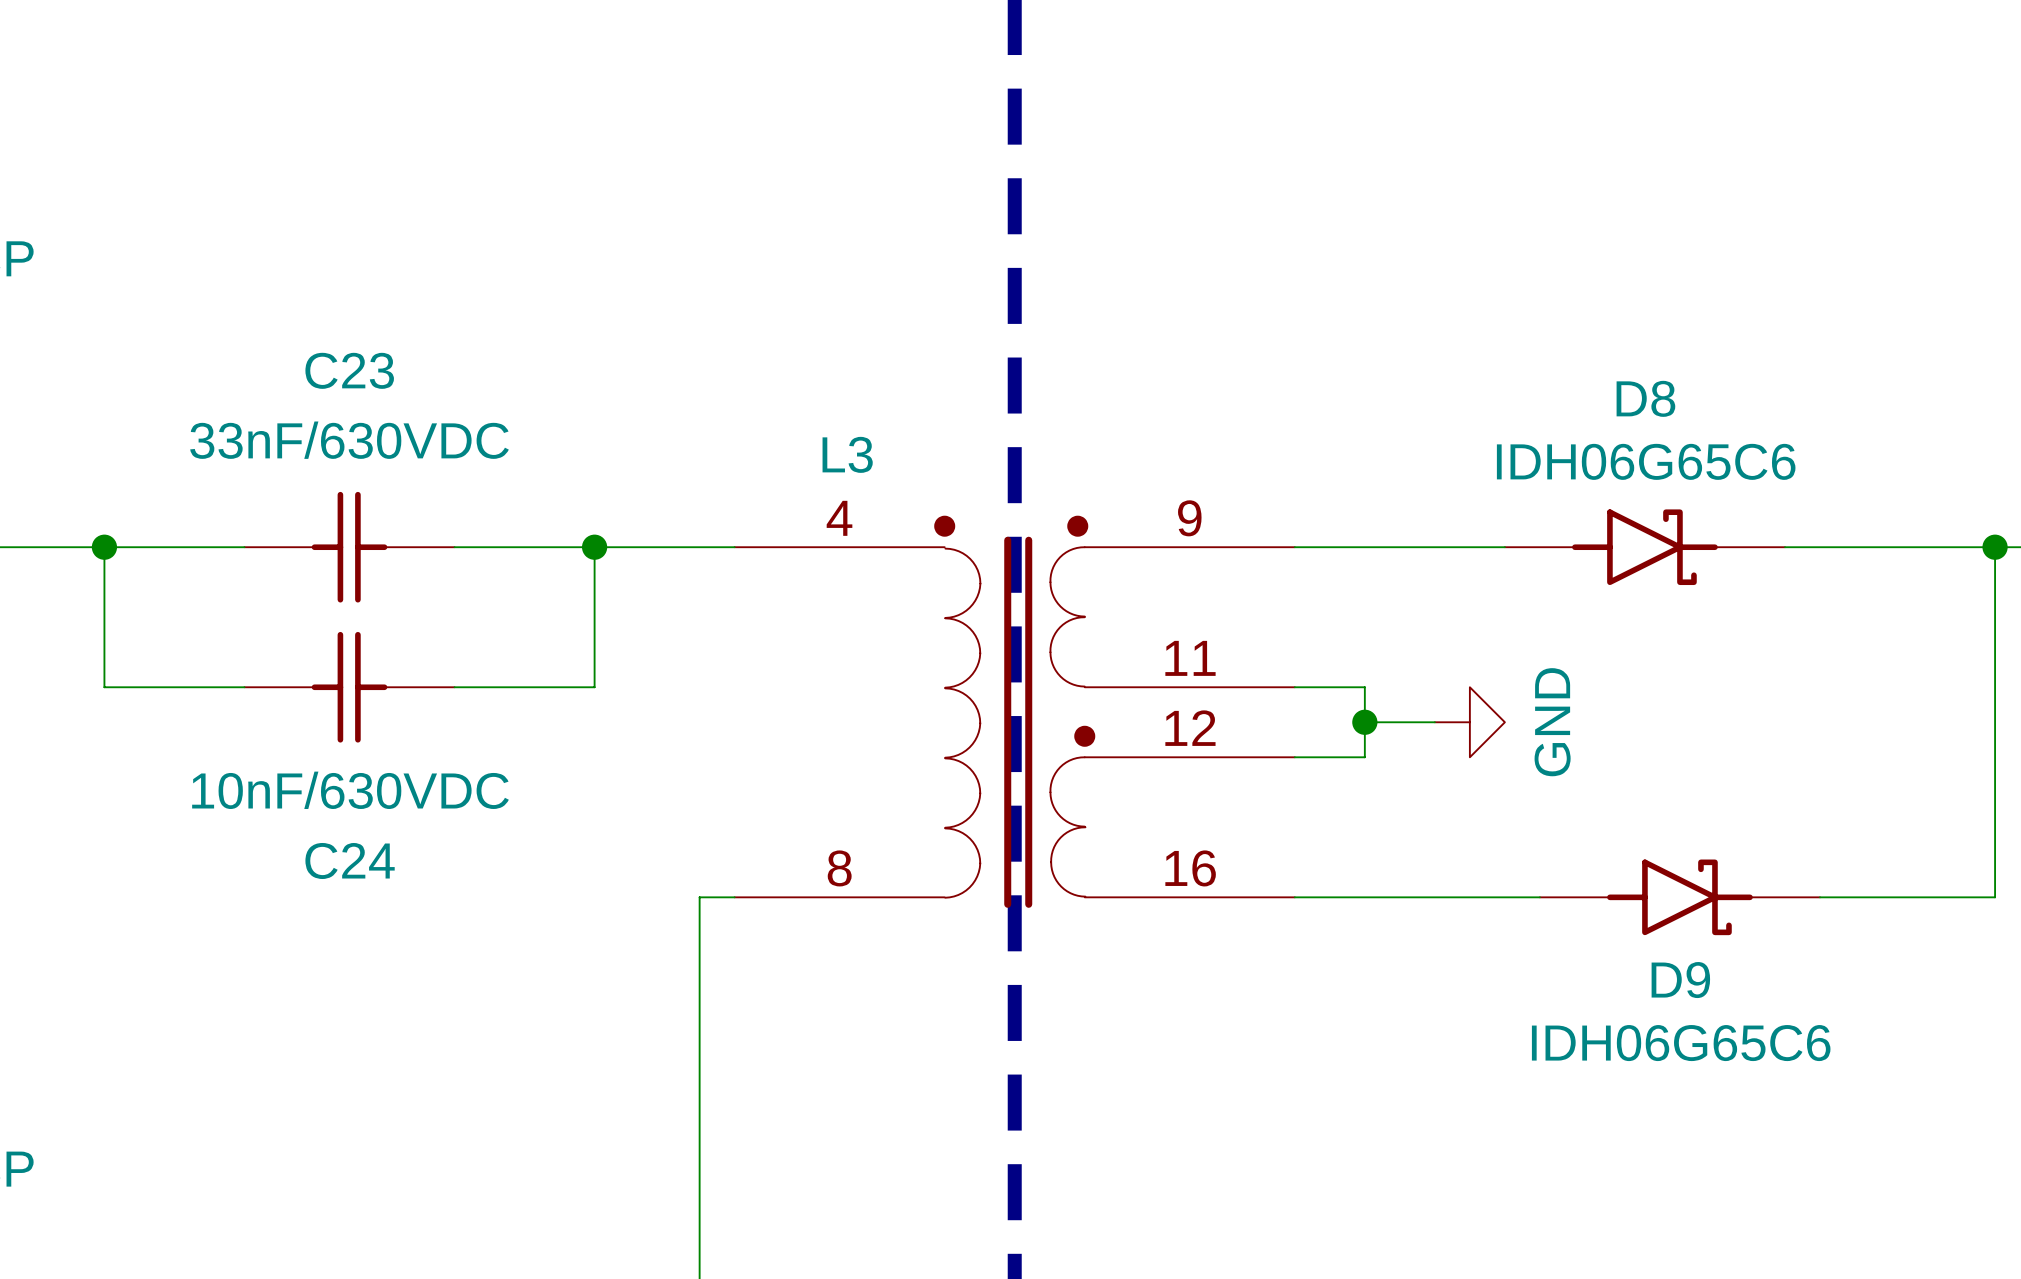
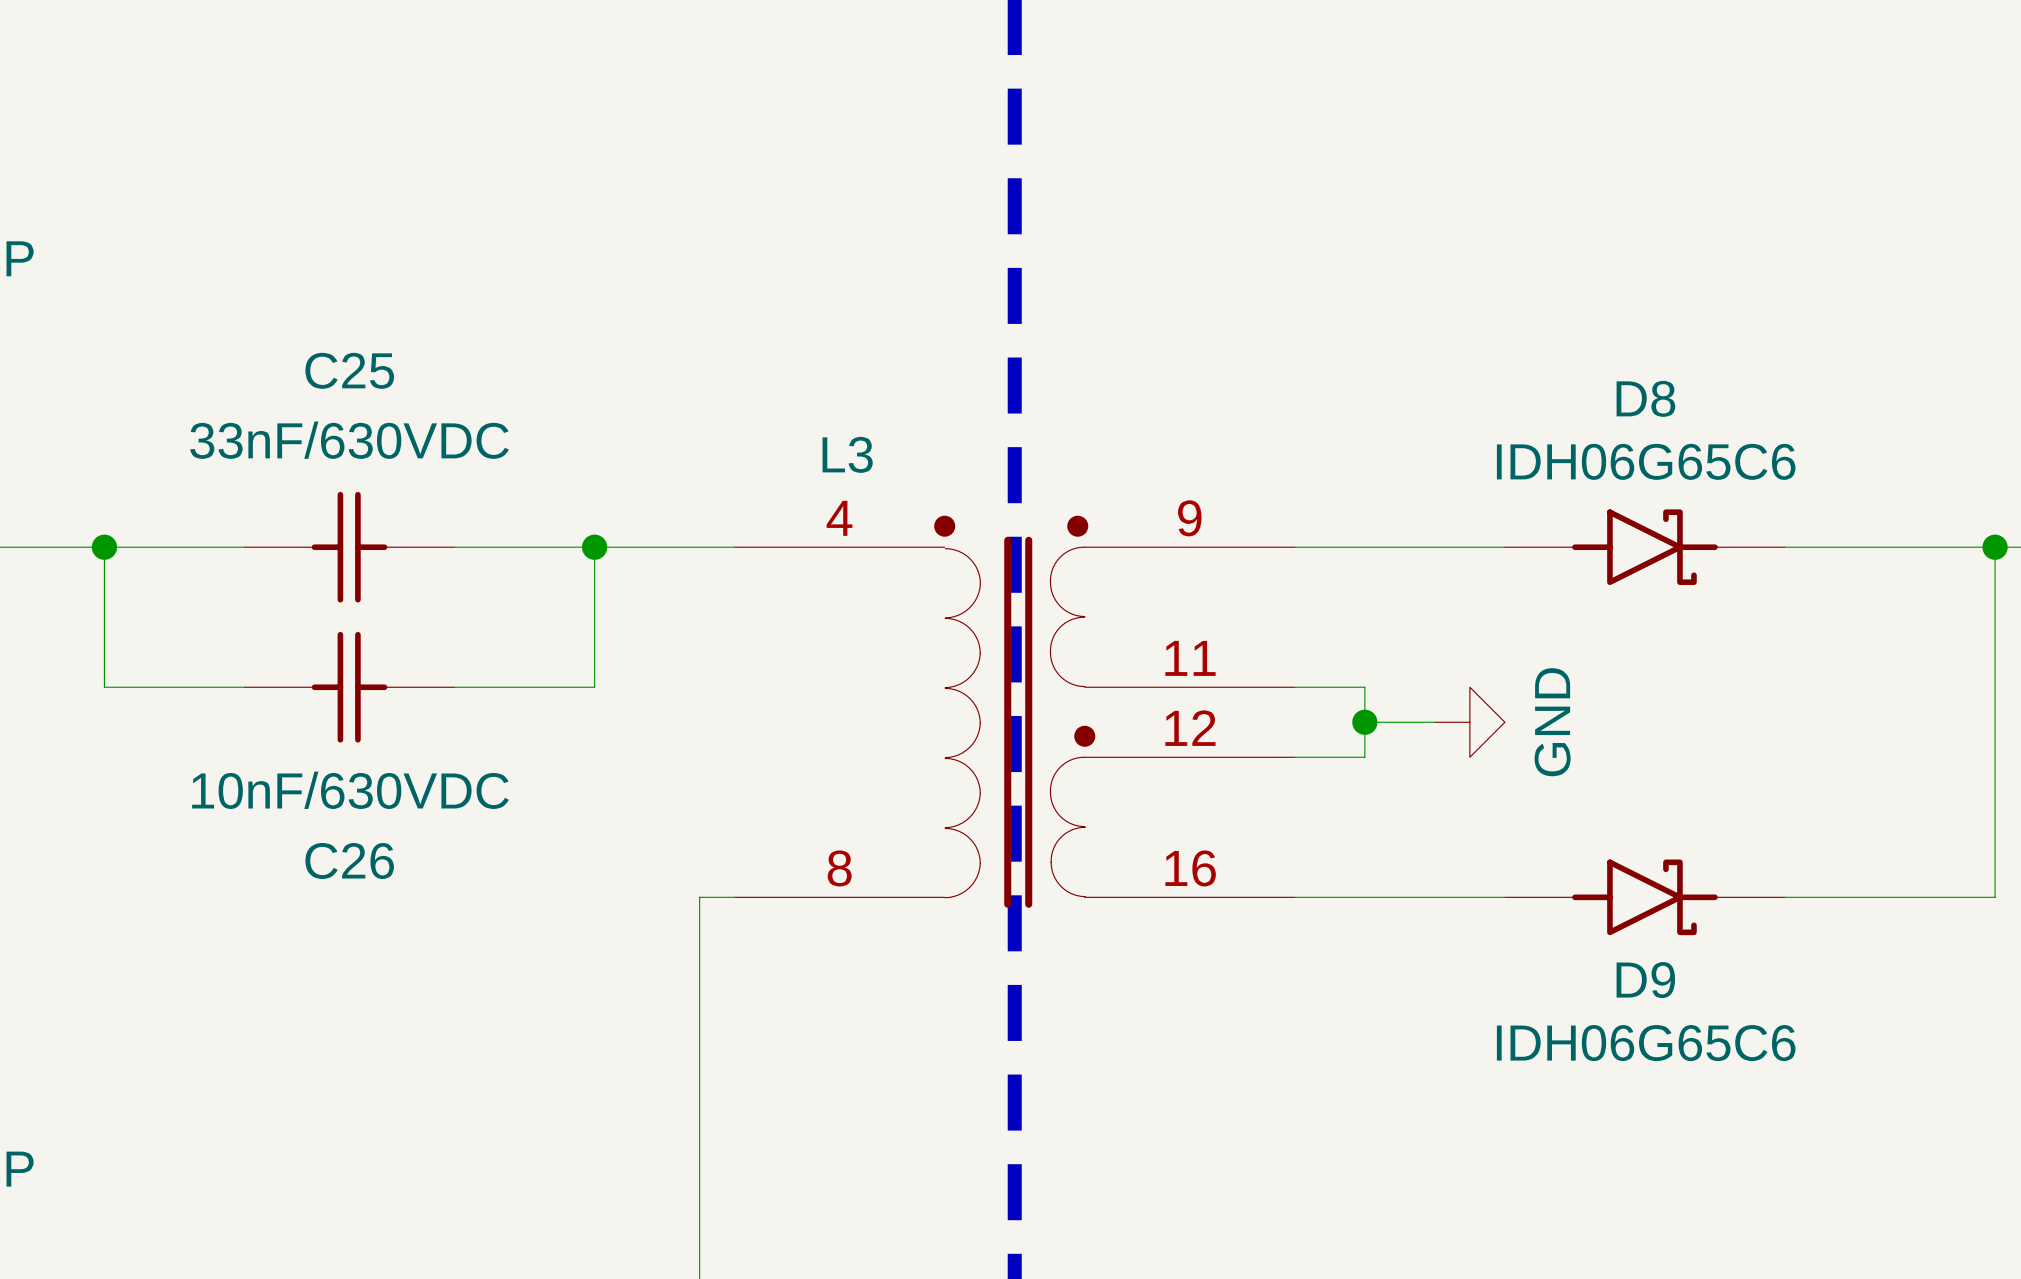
C23 name: C23 (349, 370) -> C25 (349, 370)
C24 name: C24 (350, 861) -> C26 (349, 861)
D9 position: (1679, 897) -> (1644, 897)

